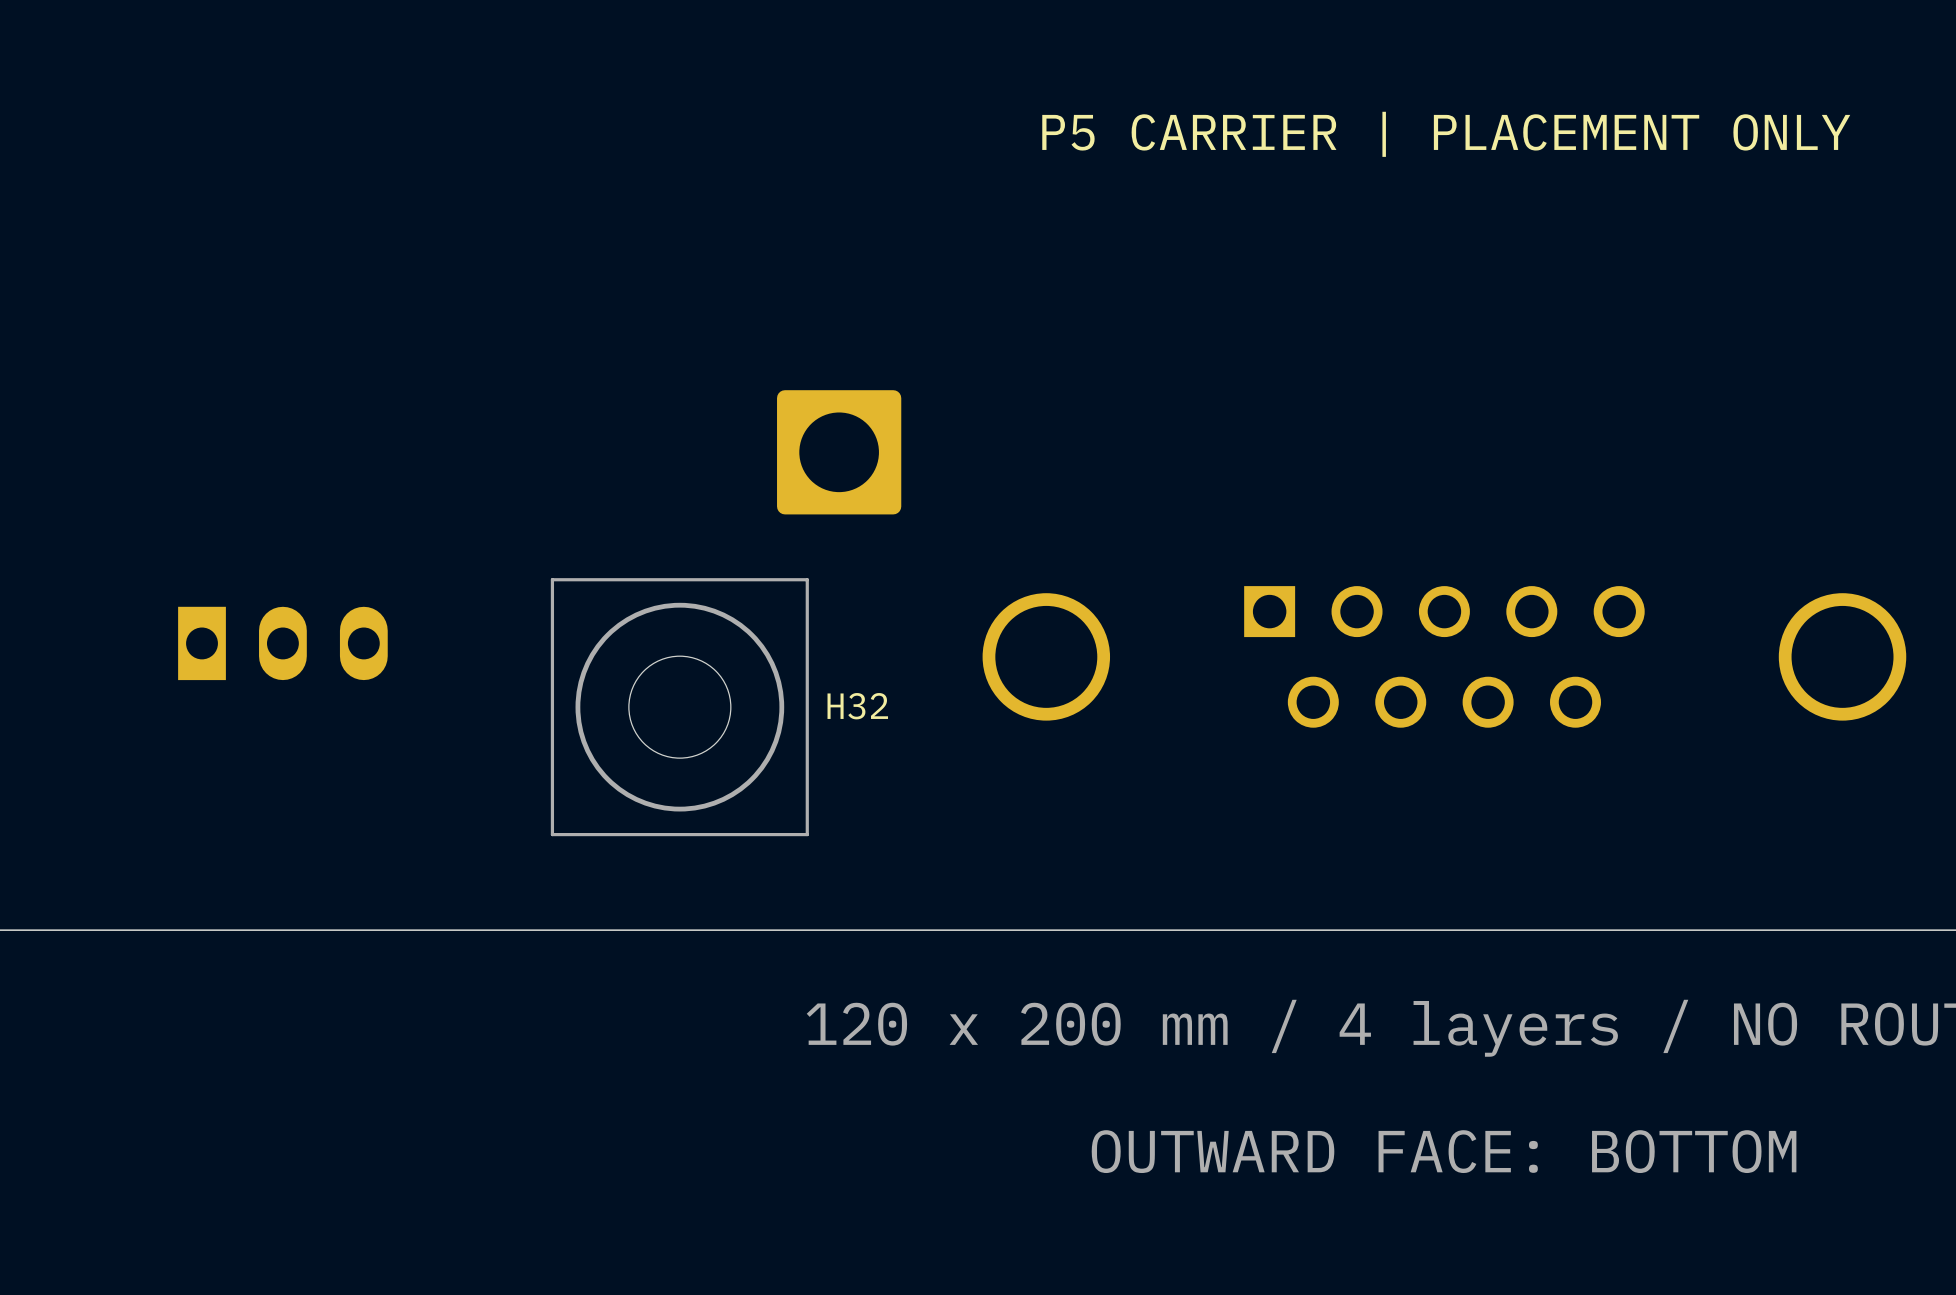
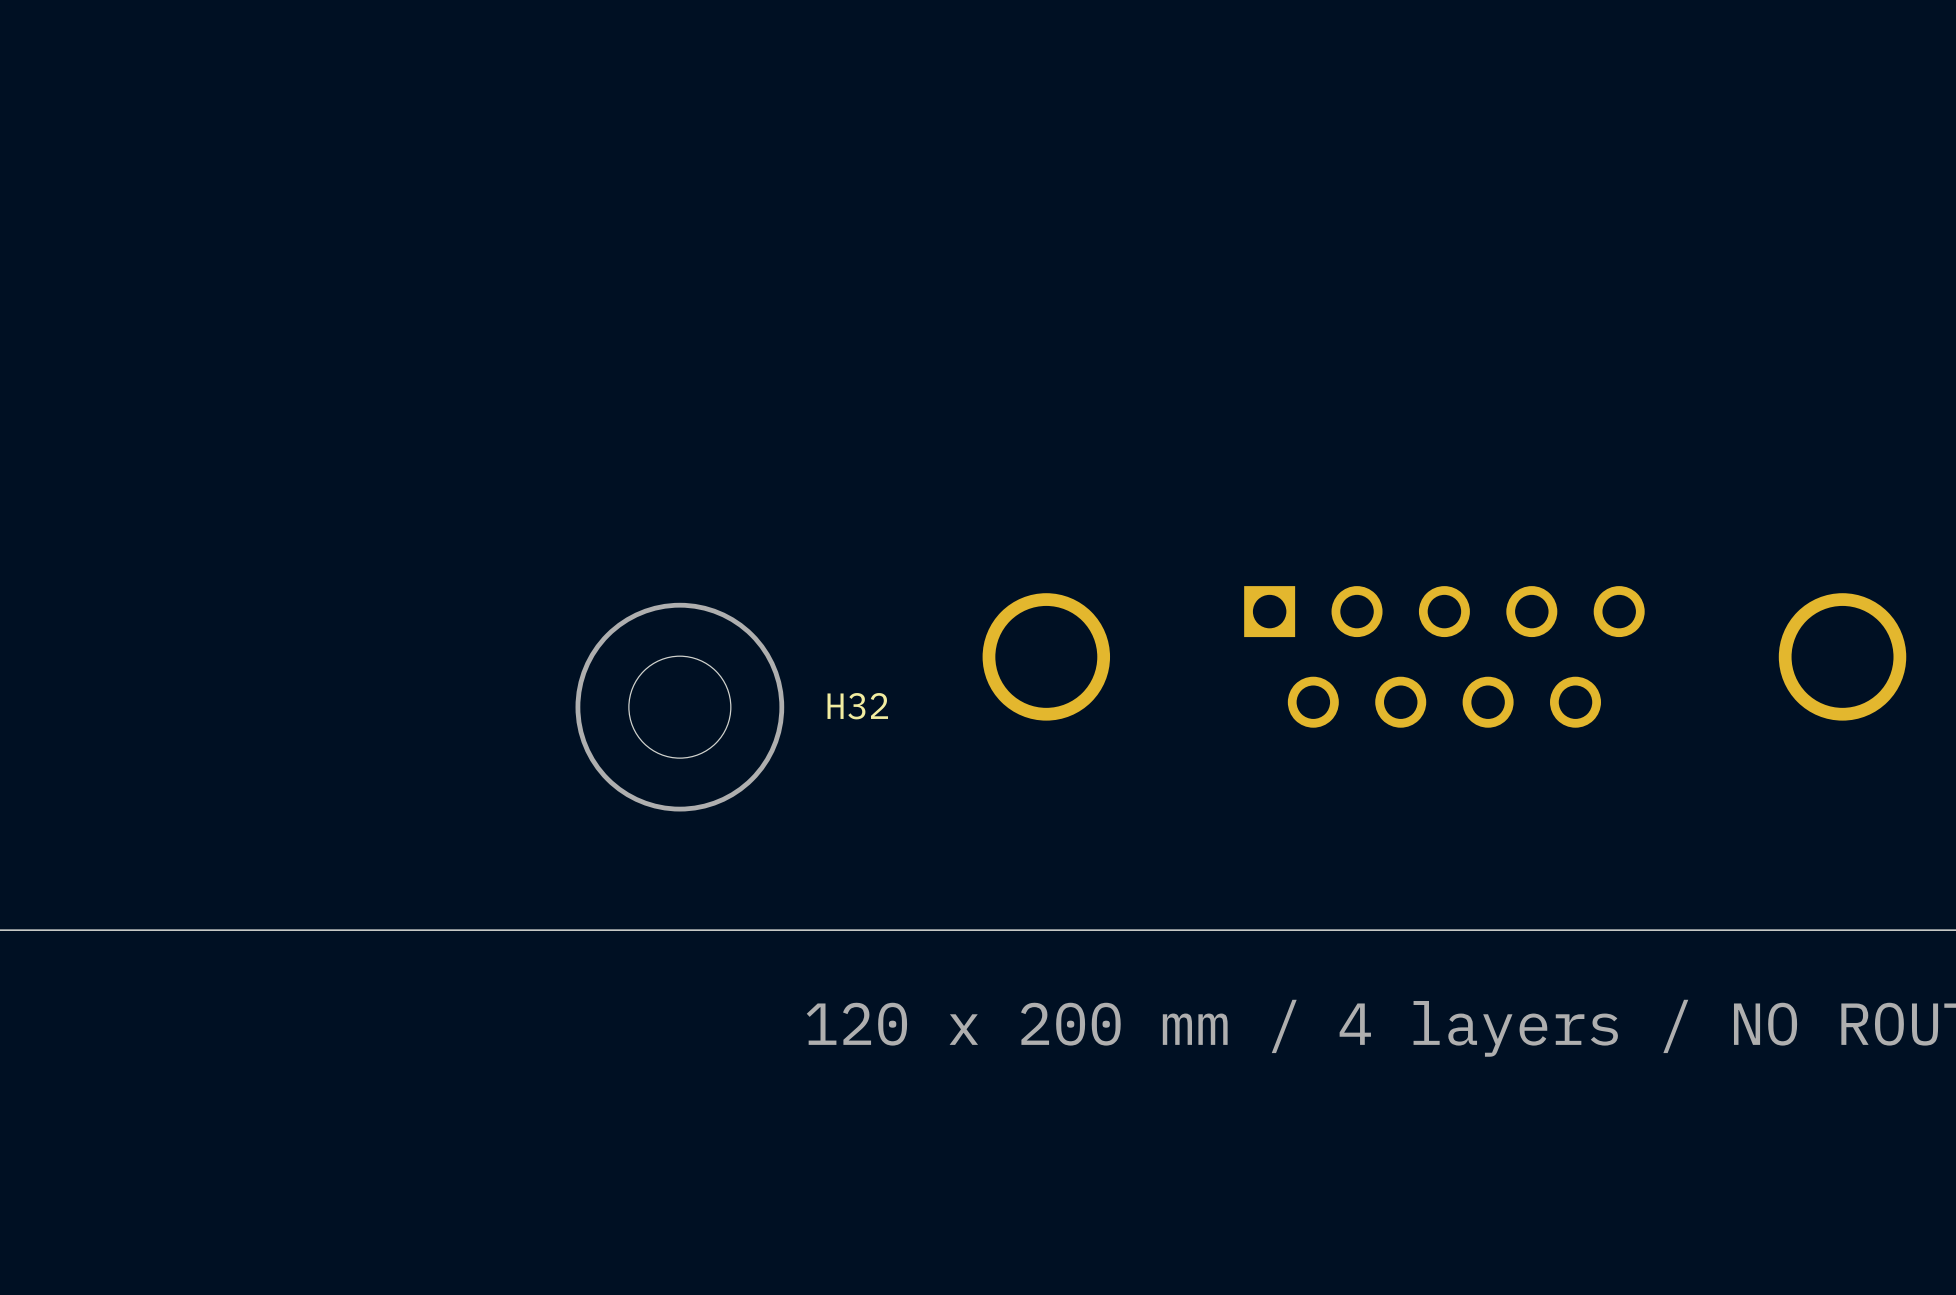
text: P5 CARRIER | PLACEMENT ONLY (1446, 134) -> none
part: (839, 452) -> none
line: (552, 579) (807, 579) (807, 834) (552, 834) (552, 579) -> none
part: (282, 643) -> none
text: OUTWARD FACE: BOTTOM (1444, 1151) -> none

